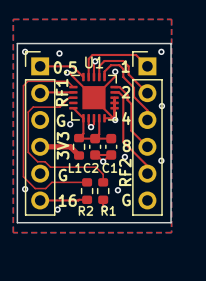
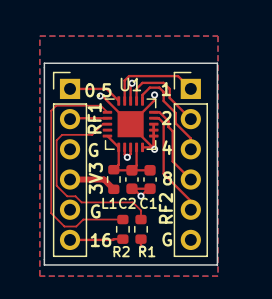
via: (25, 51) -> none
via: (161, 51) -> none
via: (59, 53) -> none
via: (161, 106) -> none
via: (70, 124) -> none
via: (124, 157) -> none
via: (161, 160) -> none
via: (25, 189) -> none
via: (117, 190) -> none
via: (57, 209) -> none

